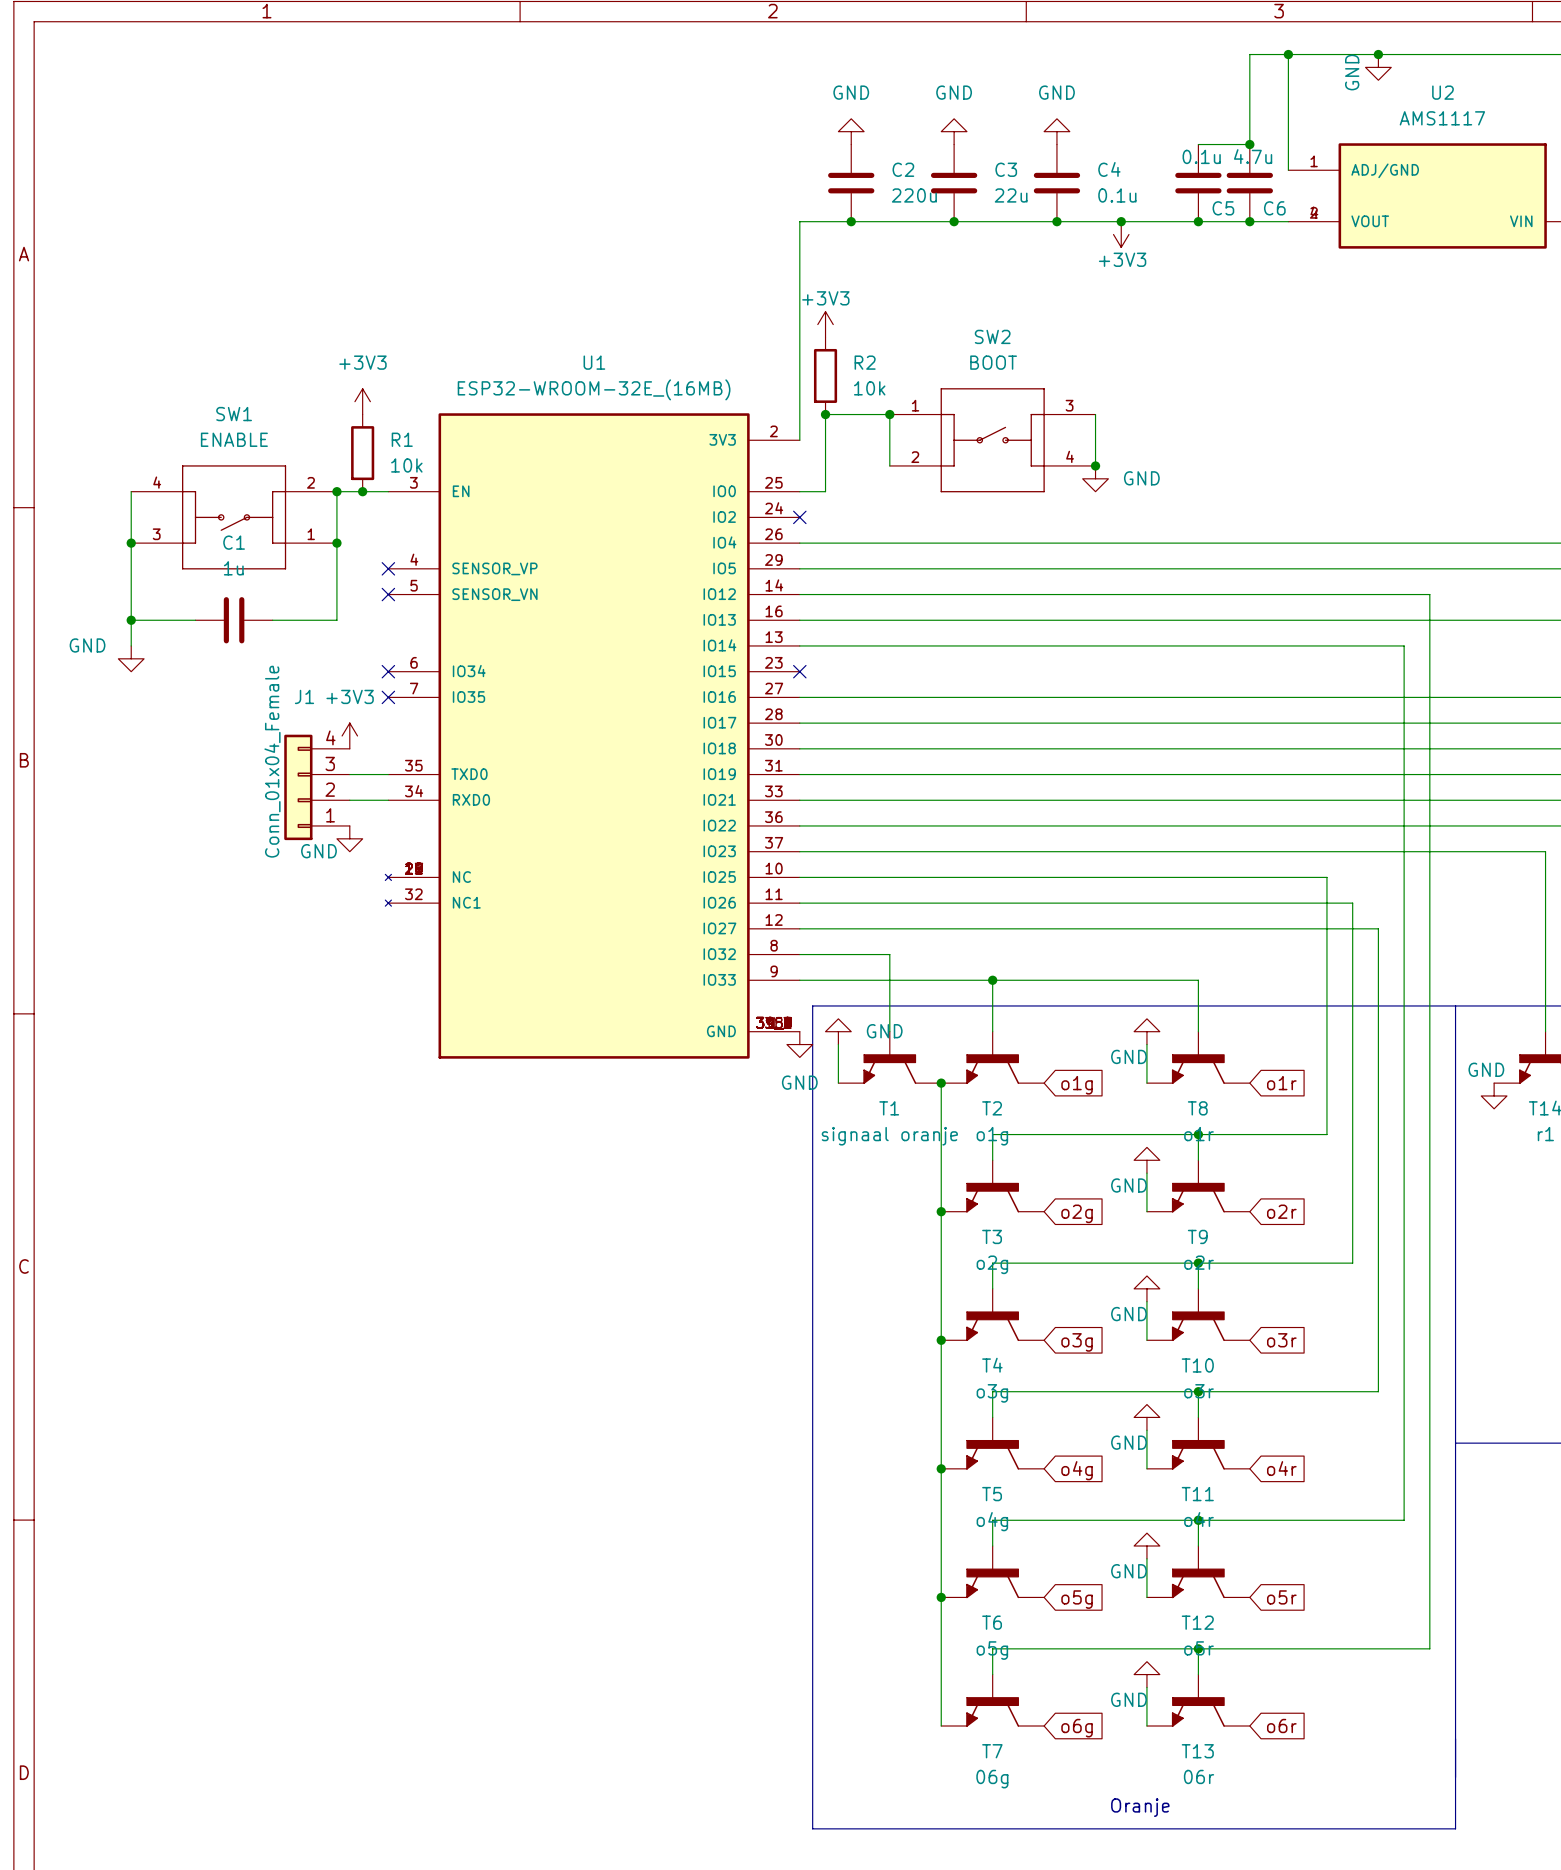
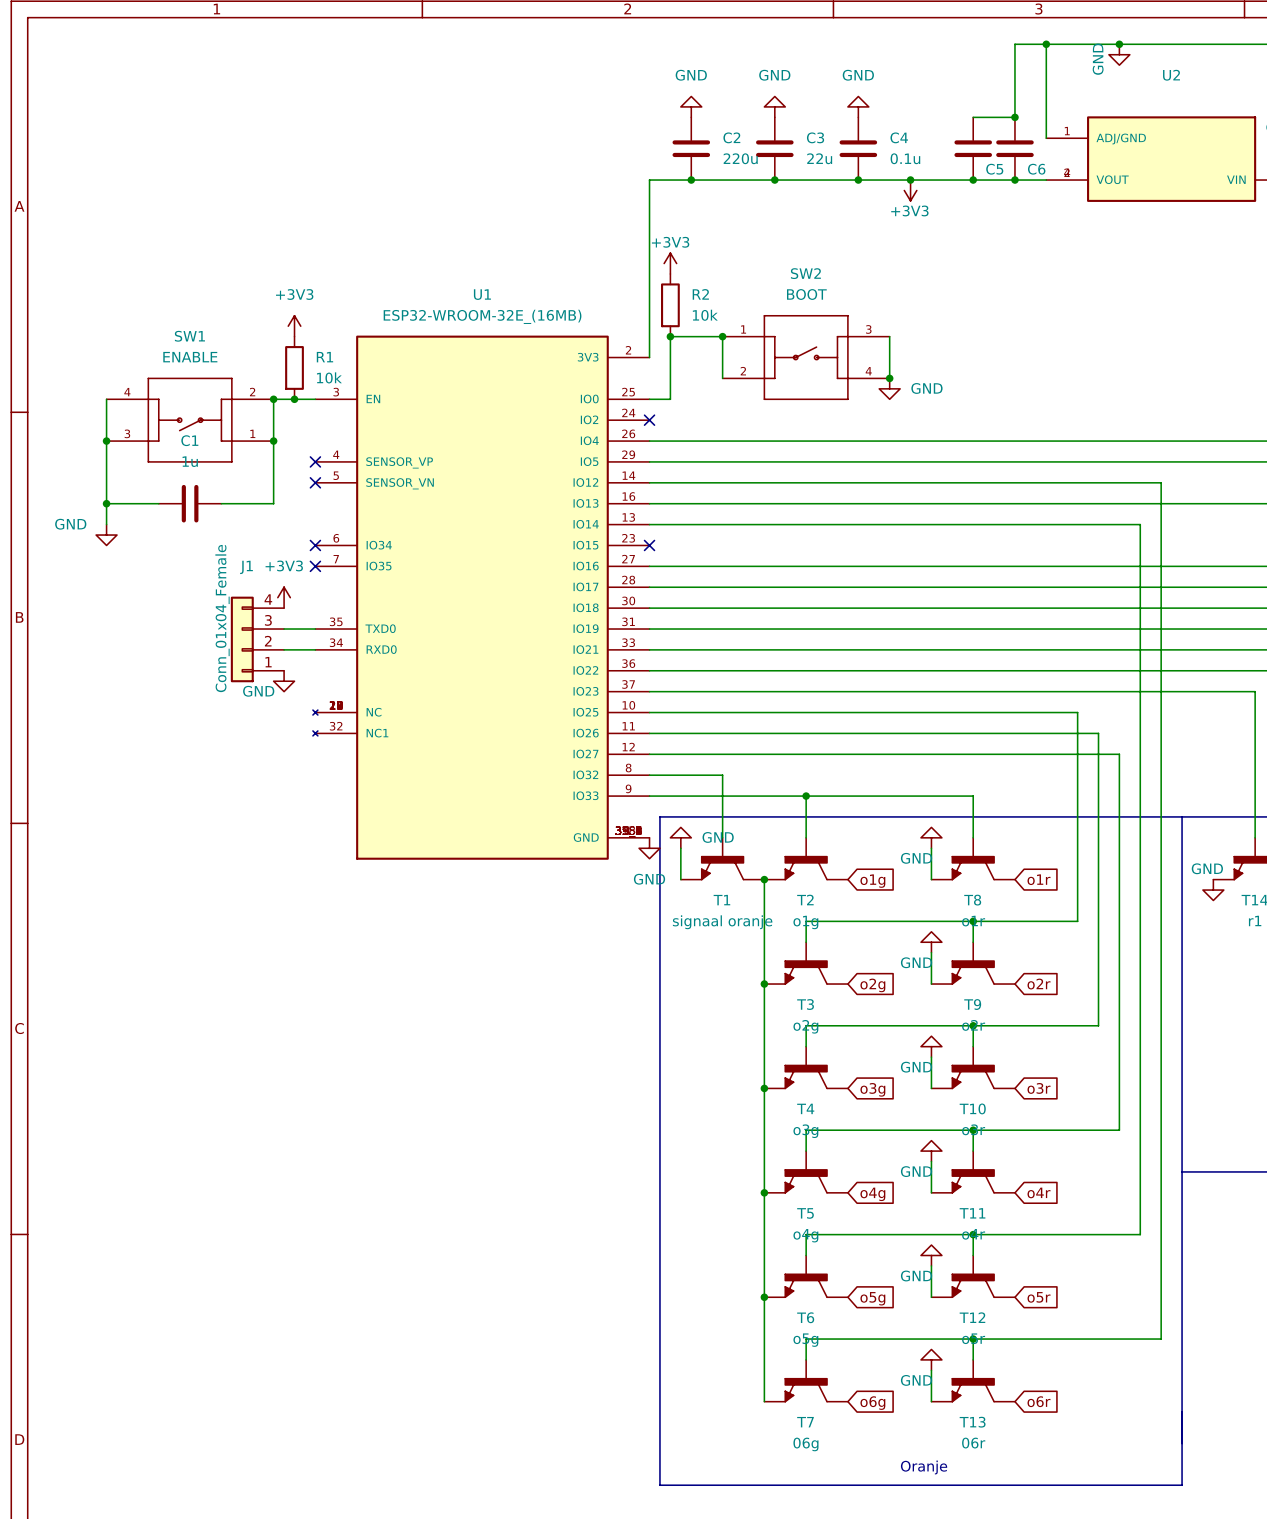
U2 value: AMS1117 (1442, 118) -> none
C5 value: 0.1u (1201, 156) -> none
C6 value: 4.7u (1253, 156) -> none

